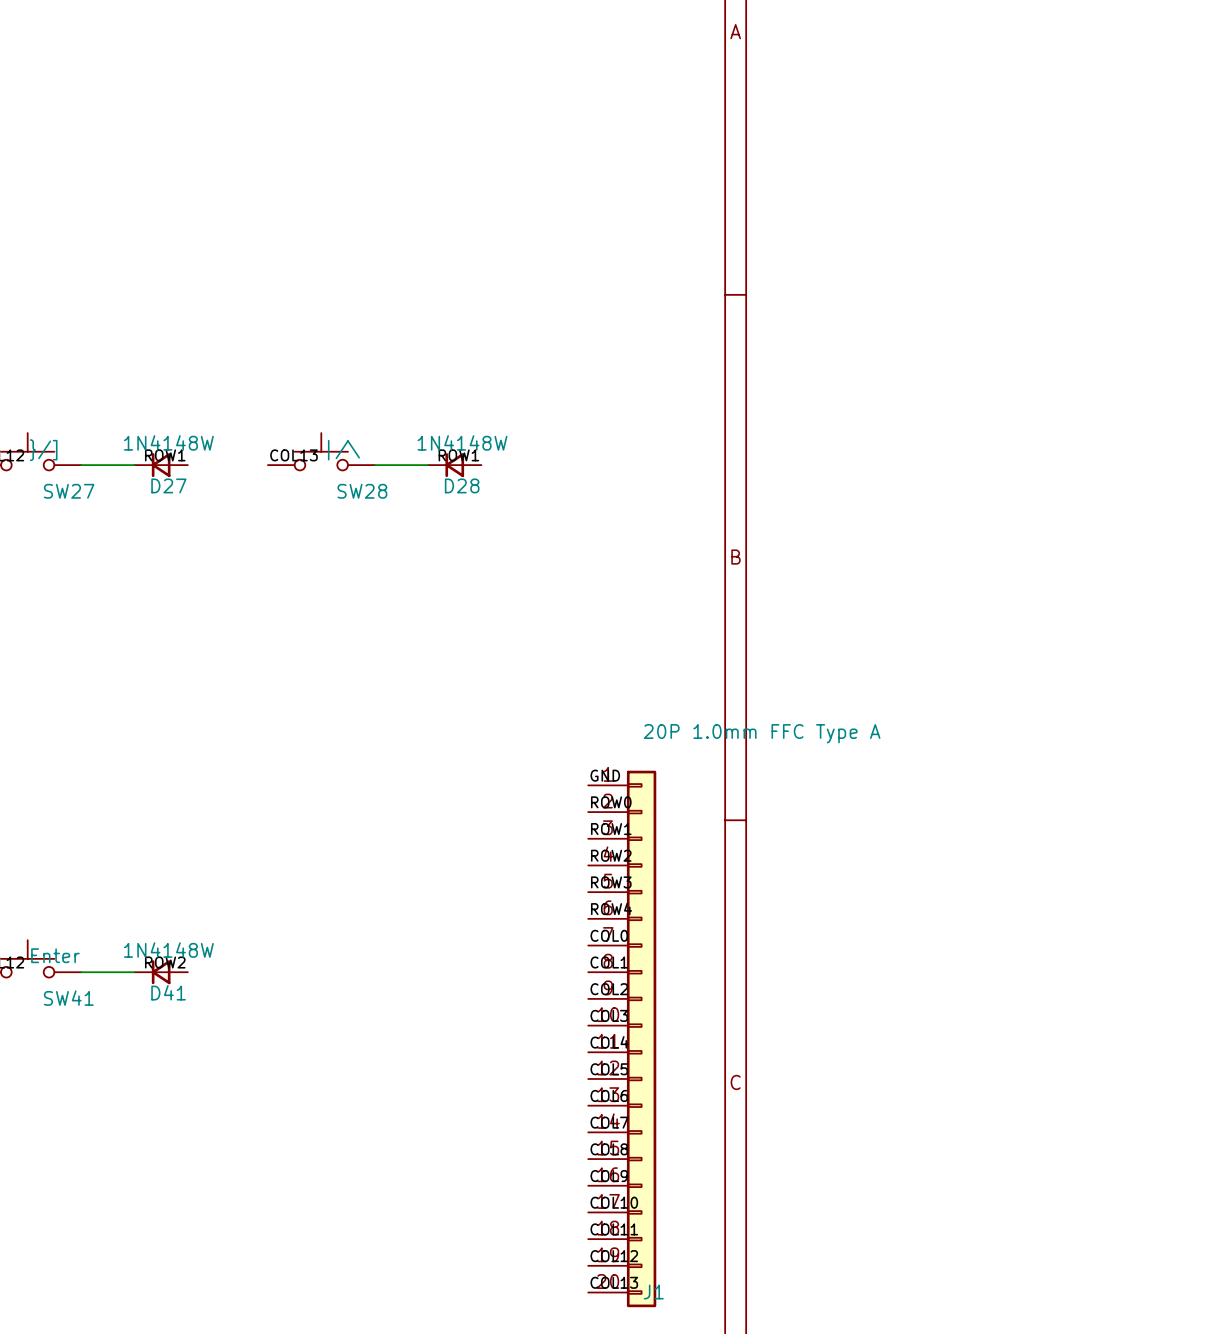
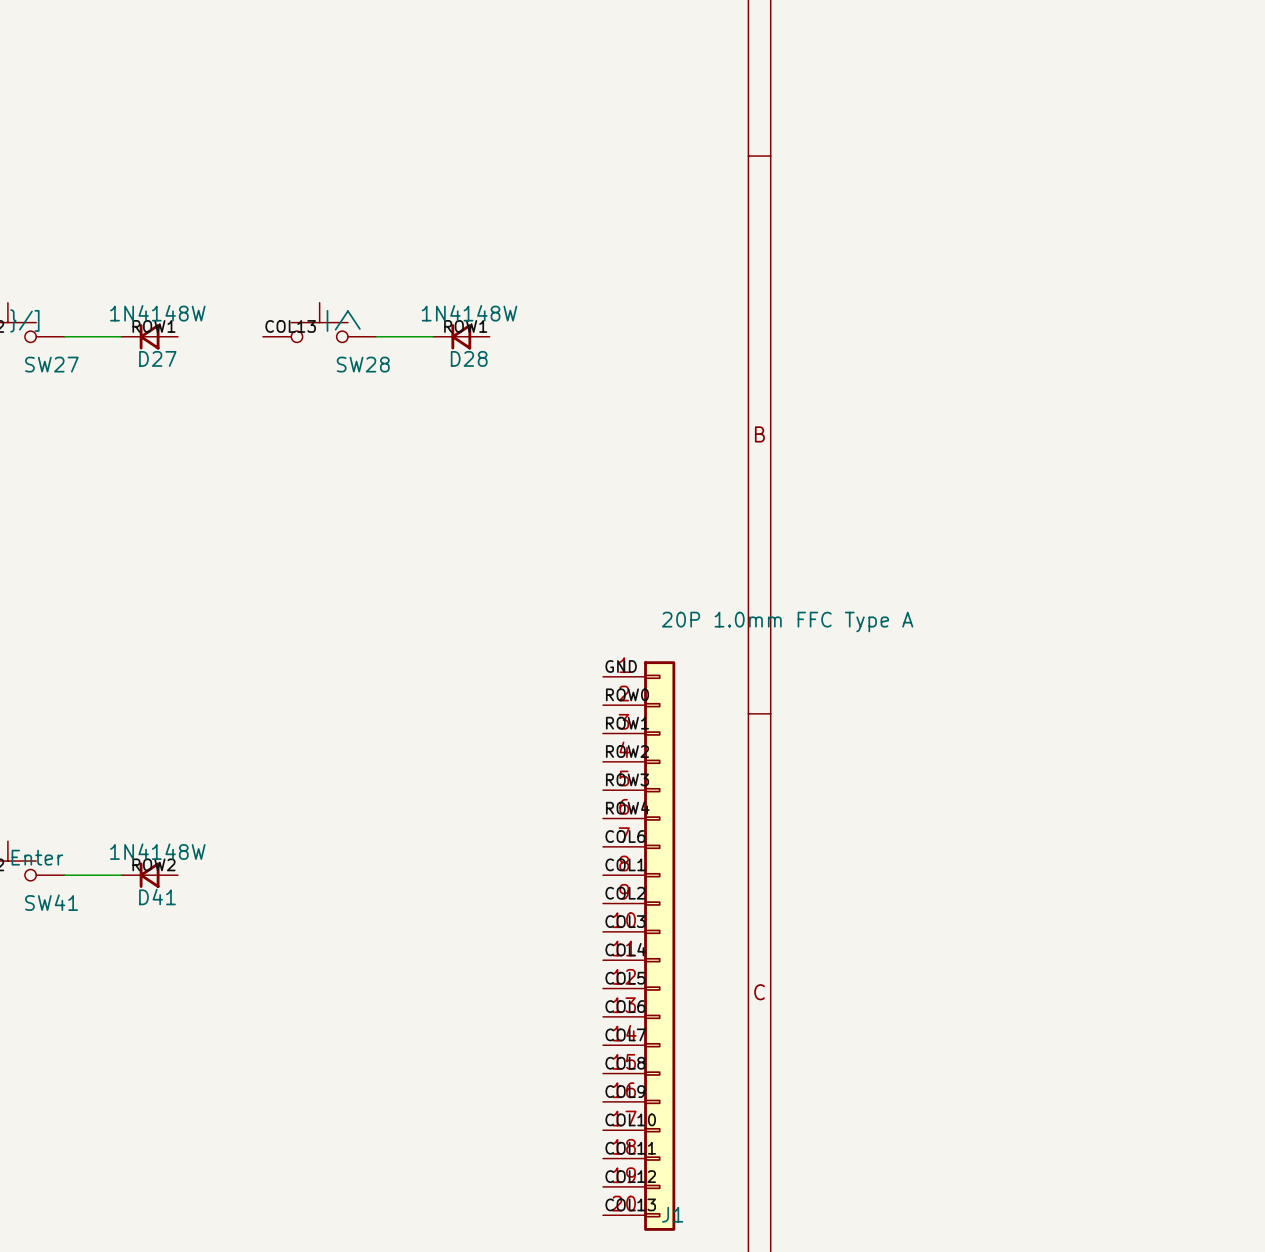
label: COL0 (609, 935) -> COL6 (625, 836)

